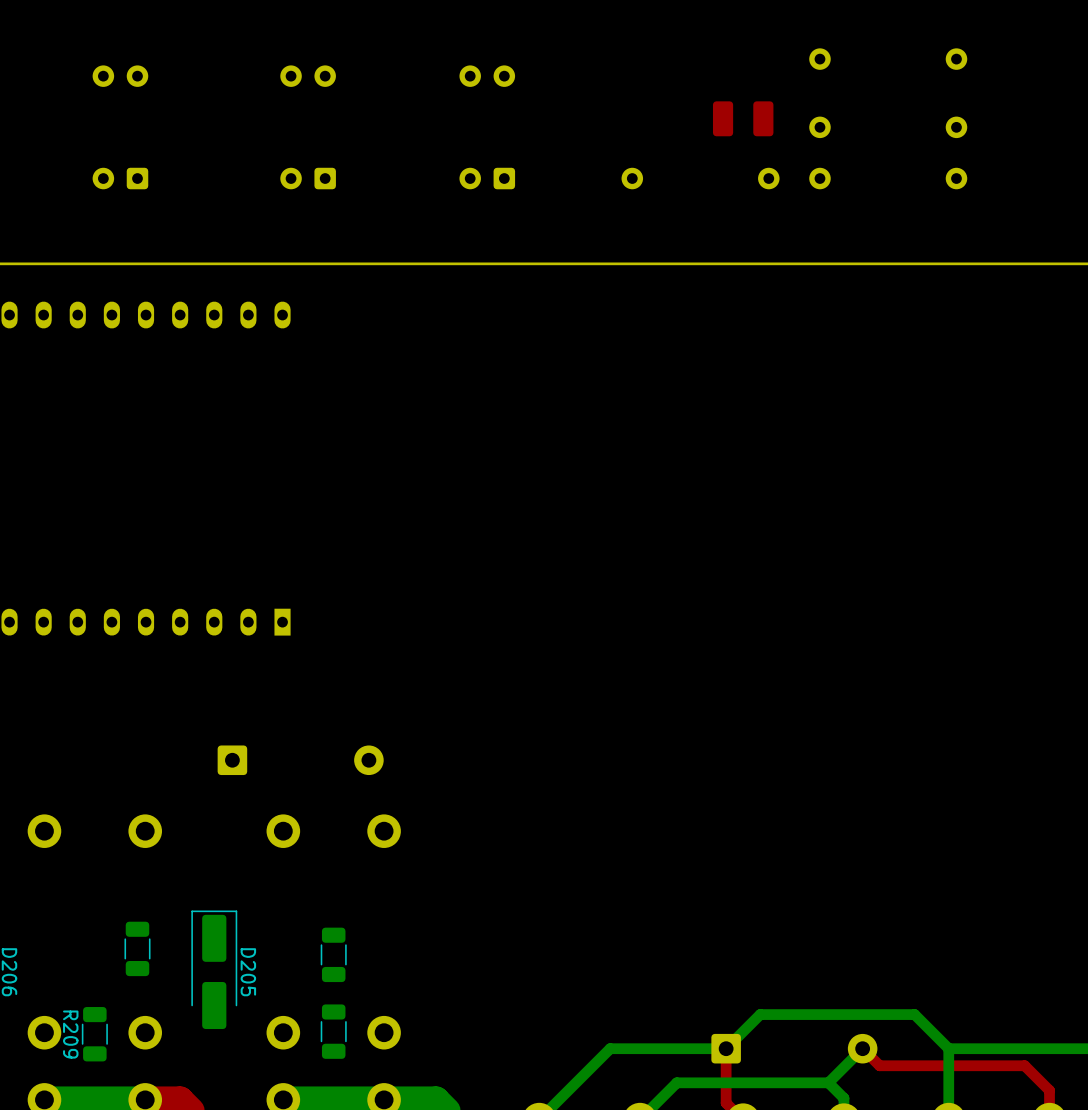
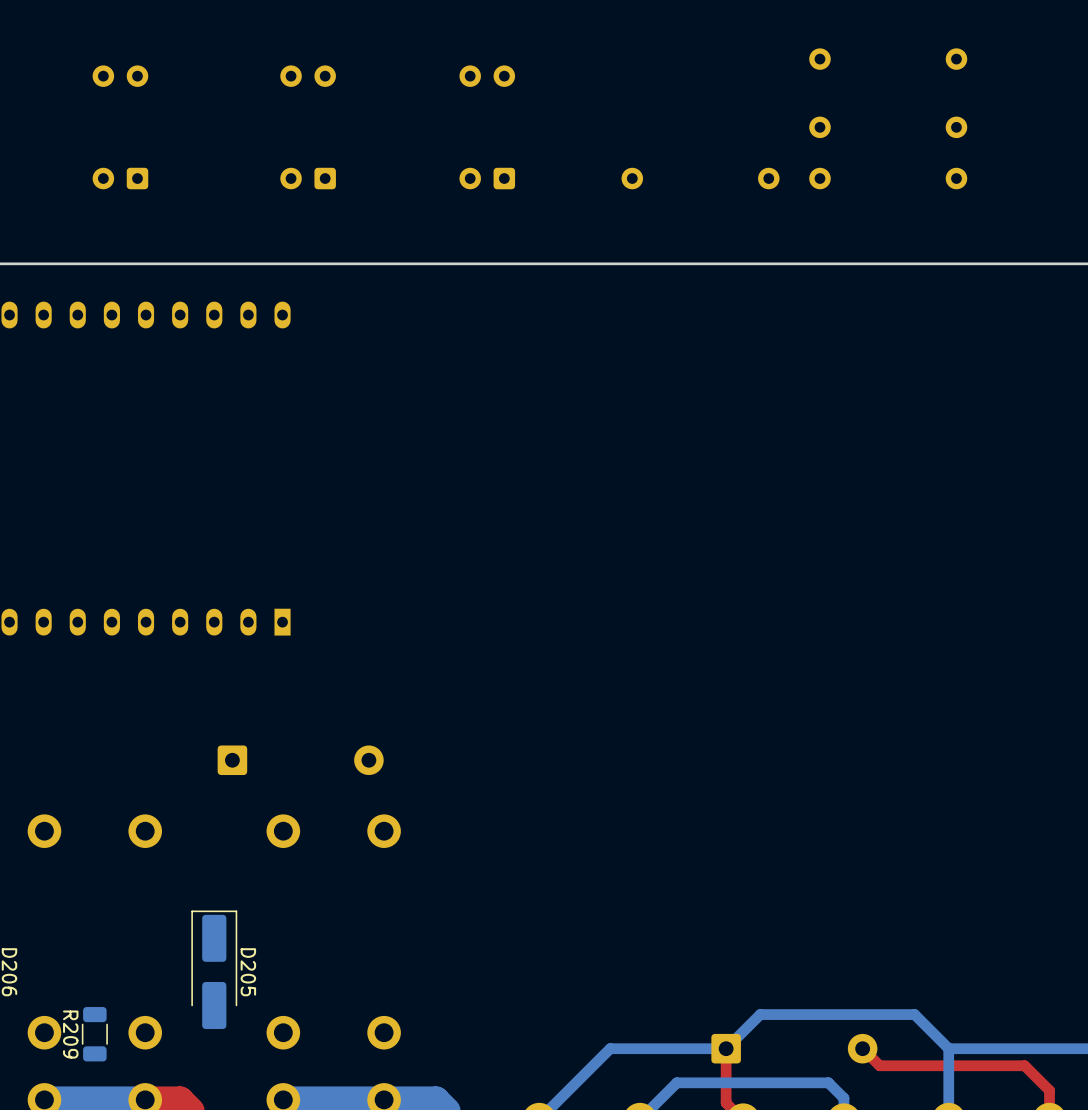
part: (743, 118) -> none
part: (137, 948) -> none
part: (333, 954) -> none
part: (333, 1031) -> none
bottom track: (862, 1048) (828, 1082) -> none

